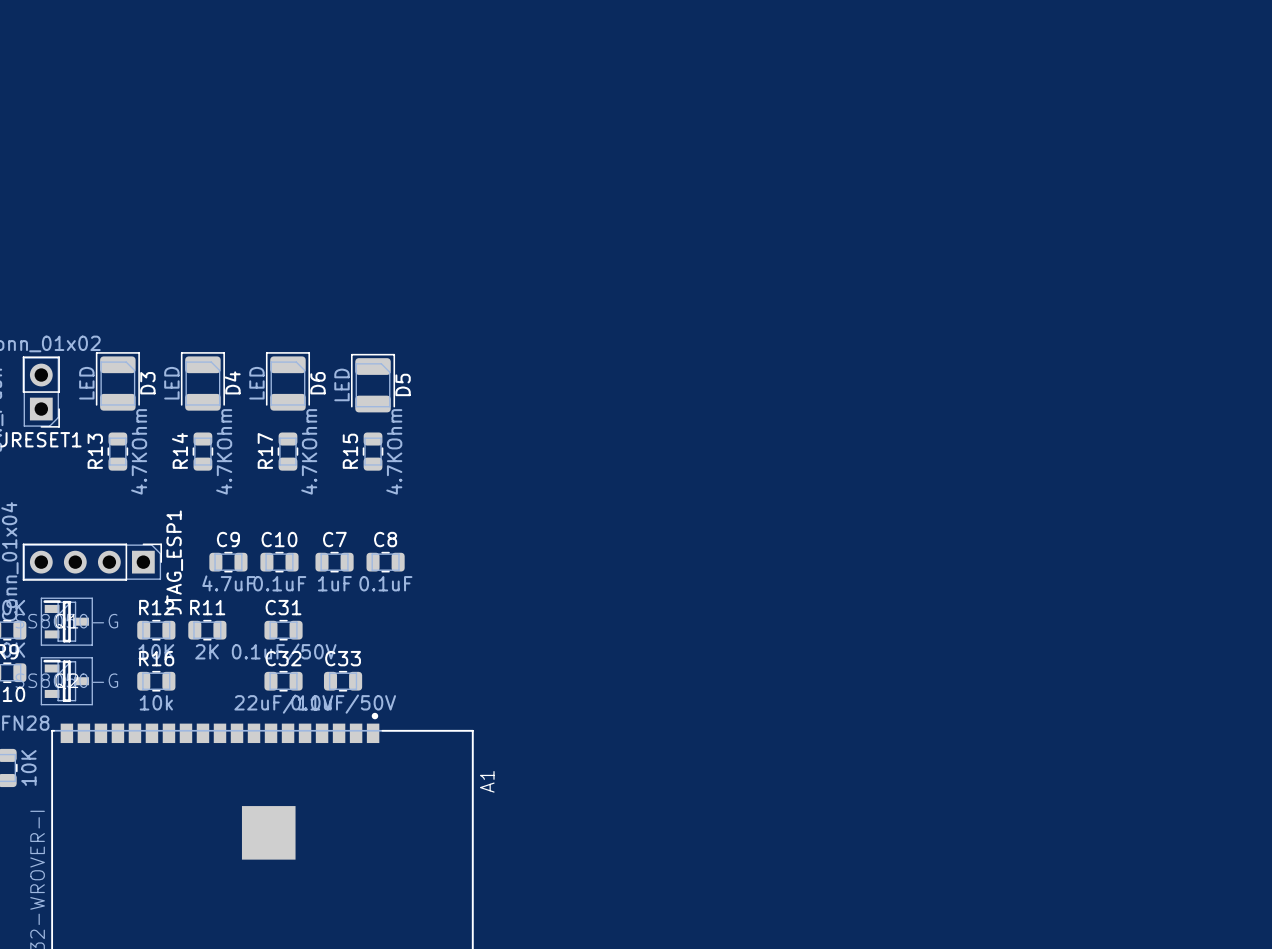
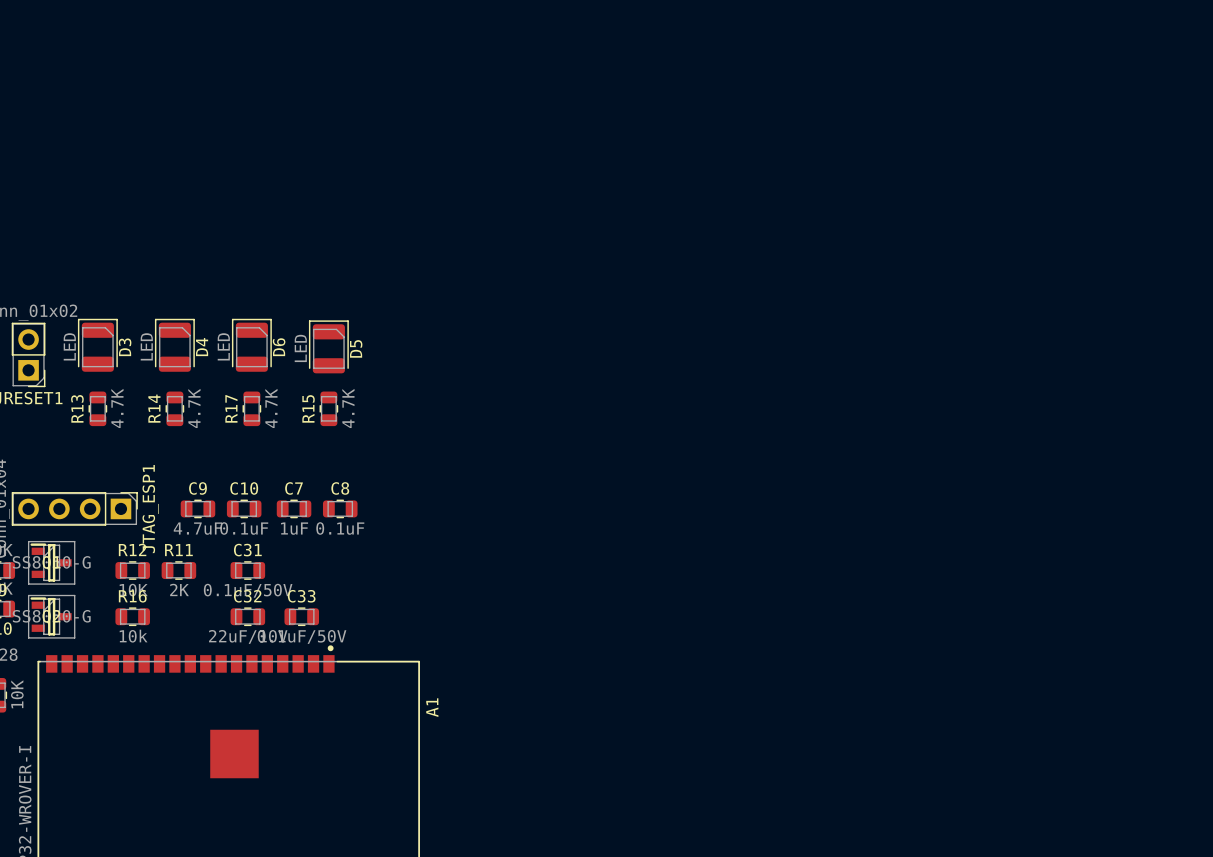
R13 value: 4.7KOhm (139, 451) -> 4.7K (117, 408)
R14 value: 4.7KOhm (224, 451) -> 4.7K (194, 408)
R17 value: 4.7KOhm (309, 451) -> 4.7K (271, 408)
R15 value: 4.7KOhm (394, 451) -> 4.7K (348, 408)

